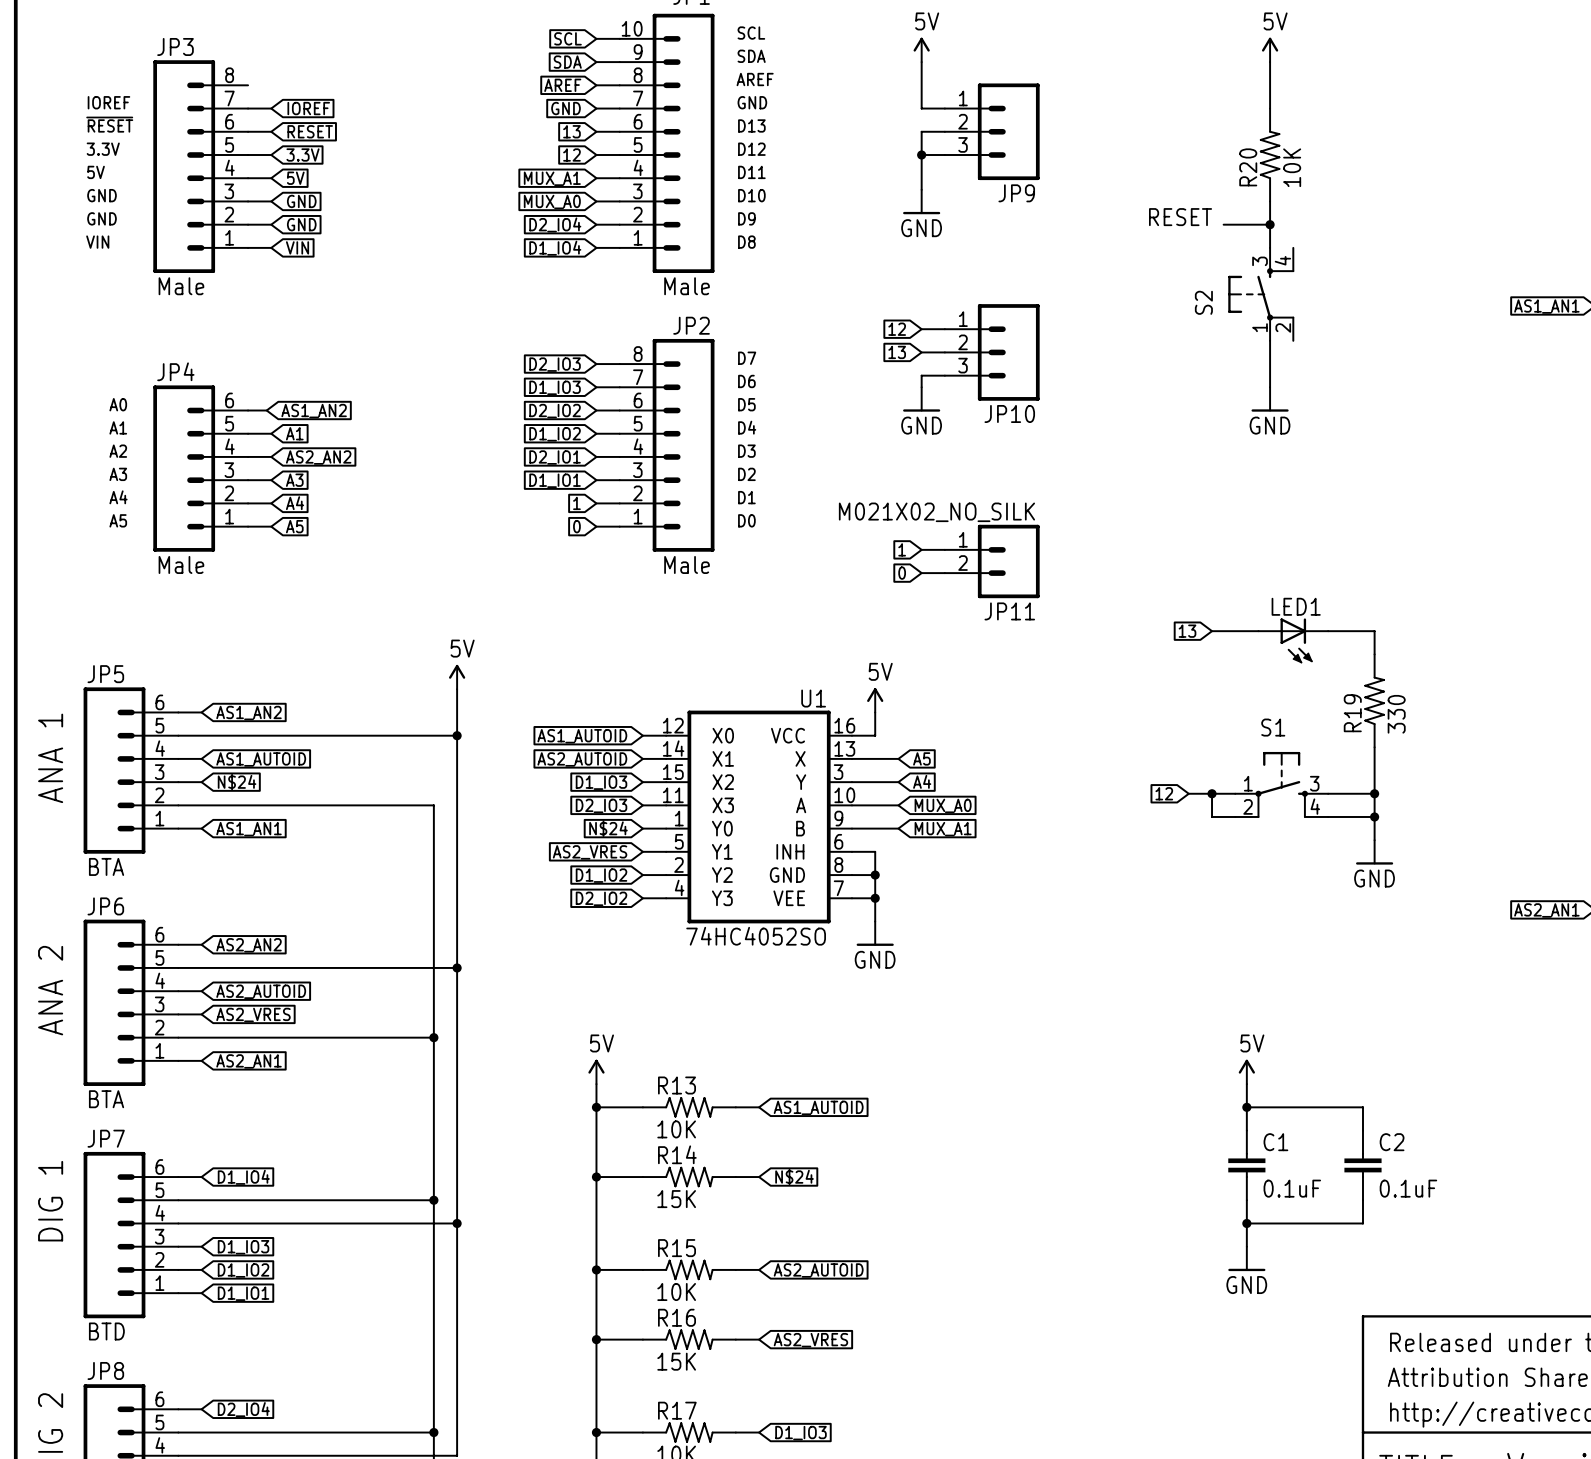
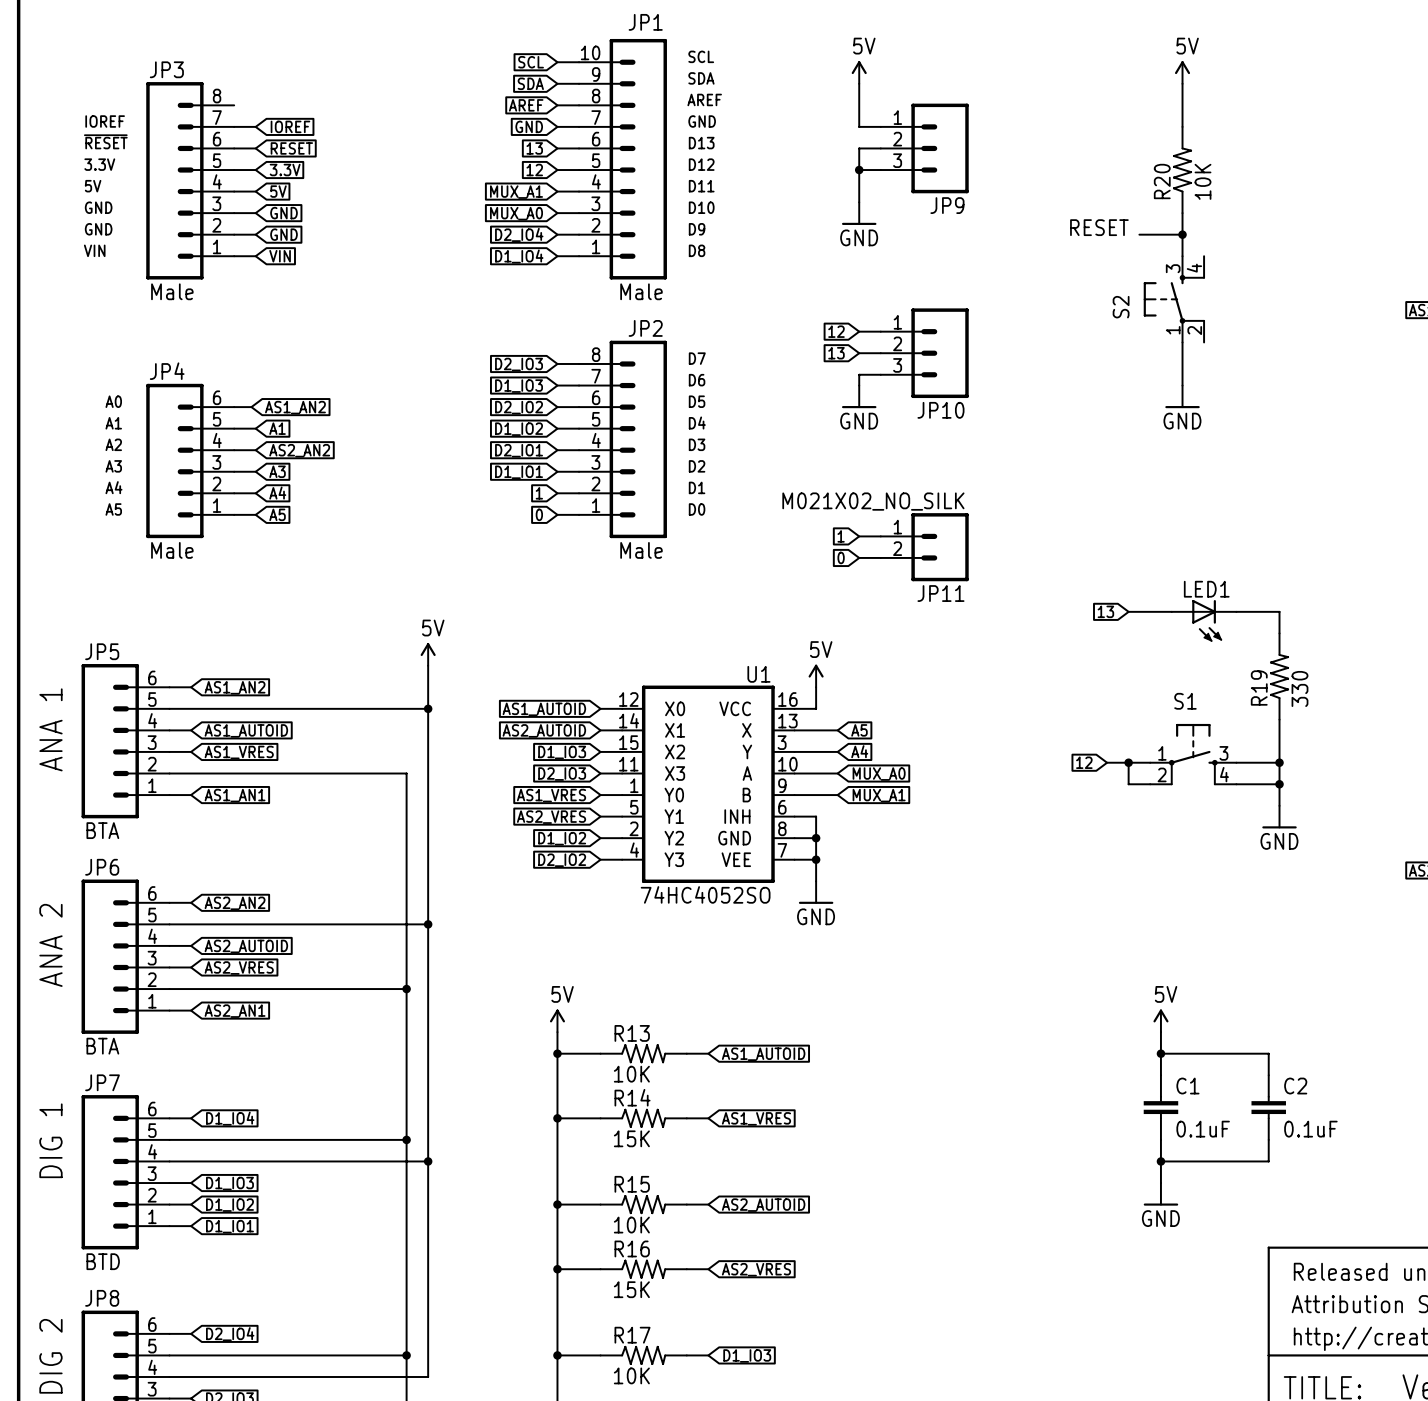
global label: N$24 (237, 782) -> AS1_VRES (239, 752)
global label: N$24 (608, 828) -> AS1_VRES (551, 795)
global label: N$24 (794, 1177) -> AS1_VRES (756, 1118)

